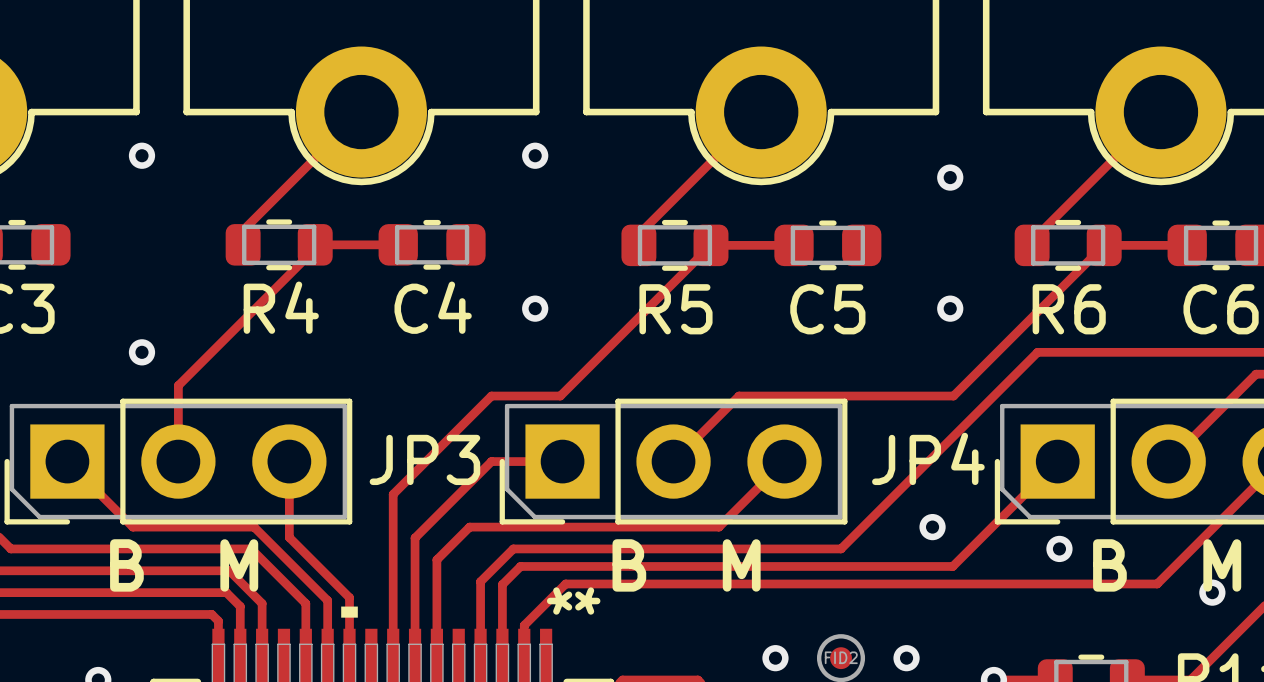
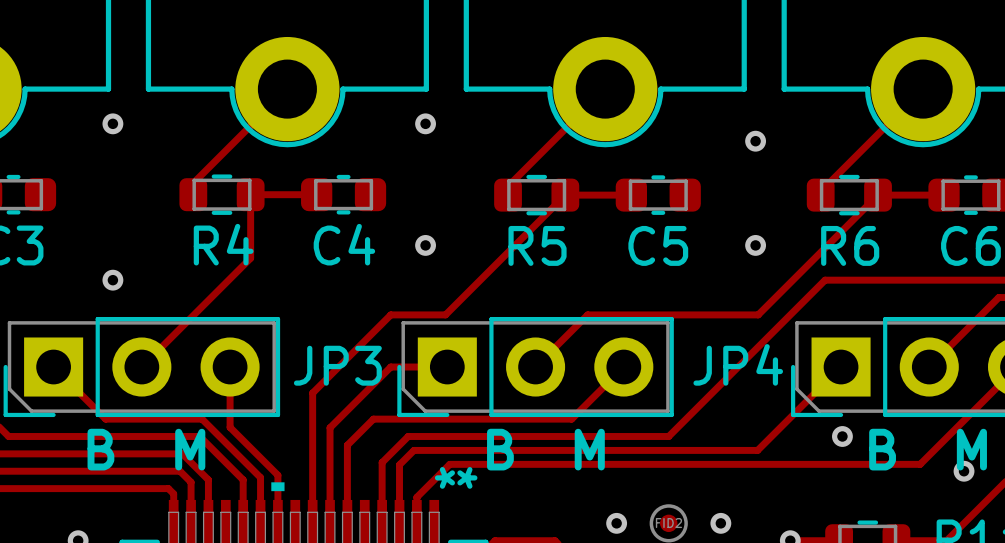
top track: (315, 248) (178, 385) (178, 461) -> (250, 197) (250, 258) (141, 367)
via: (932, 527) -> none

